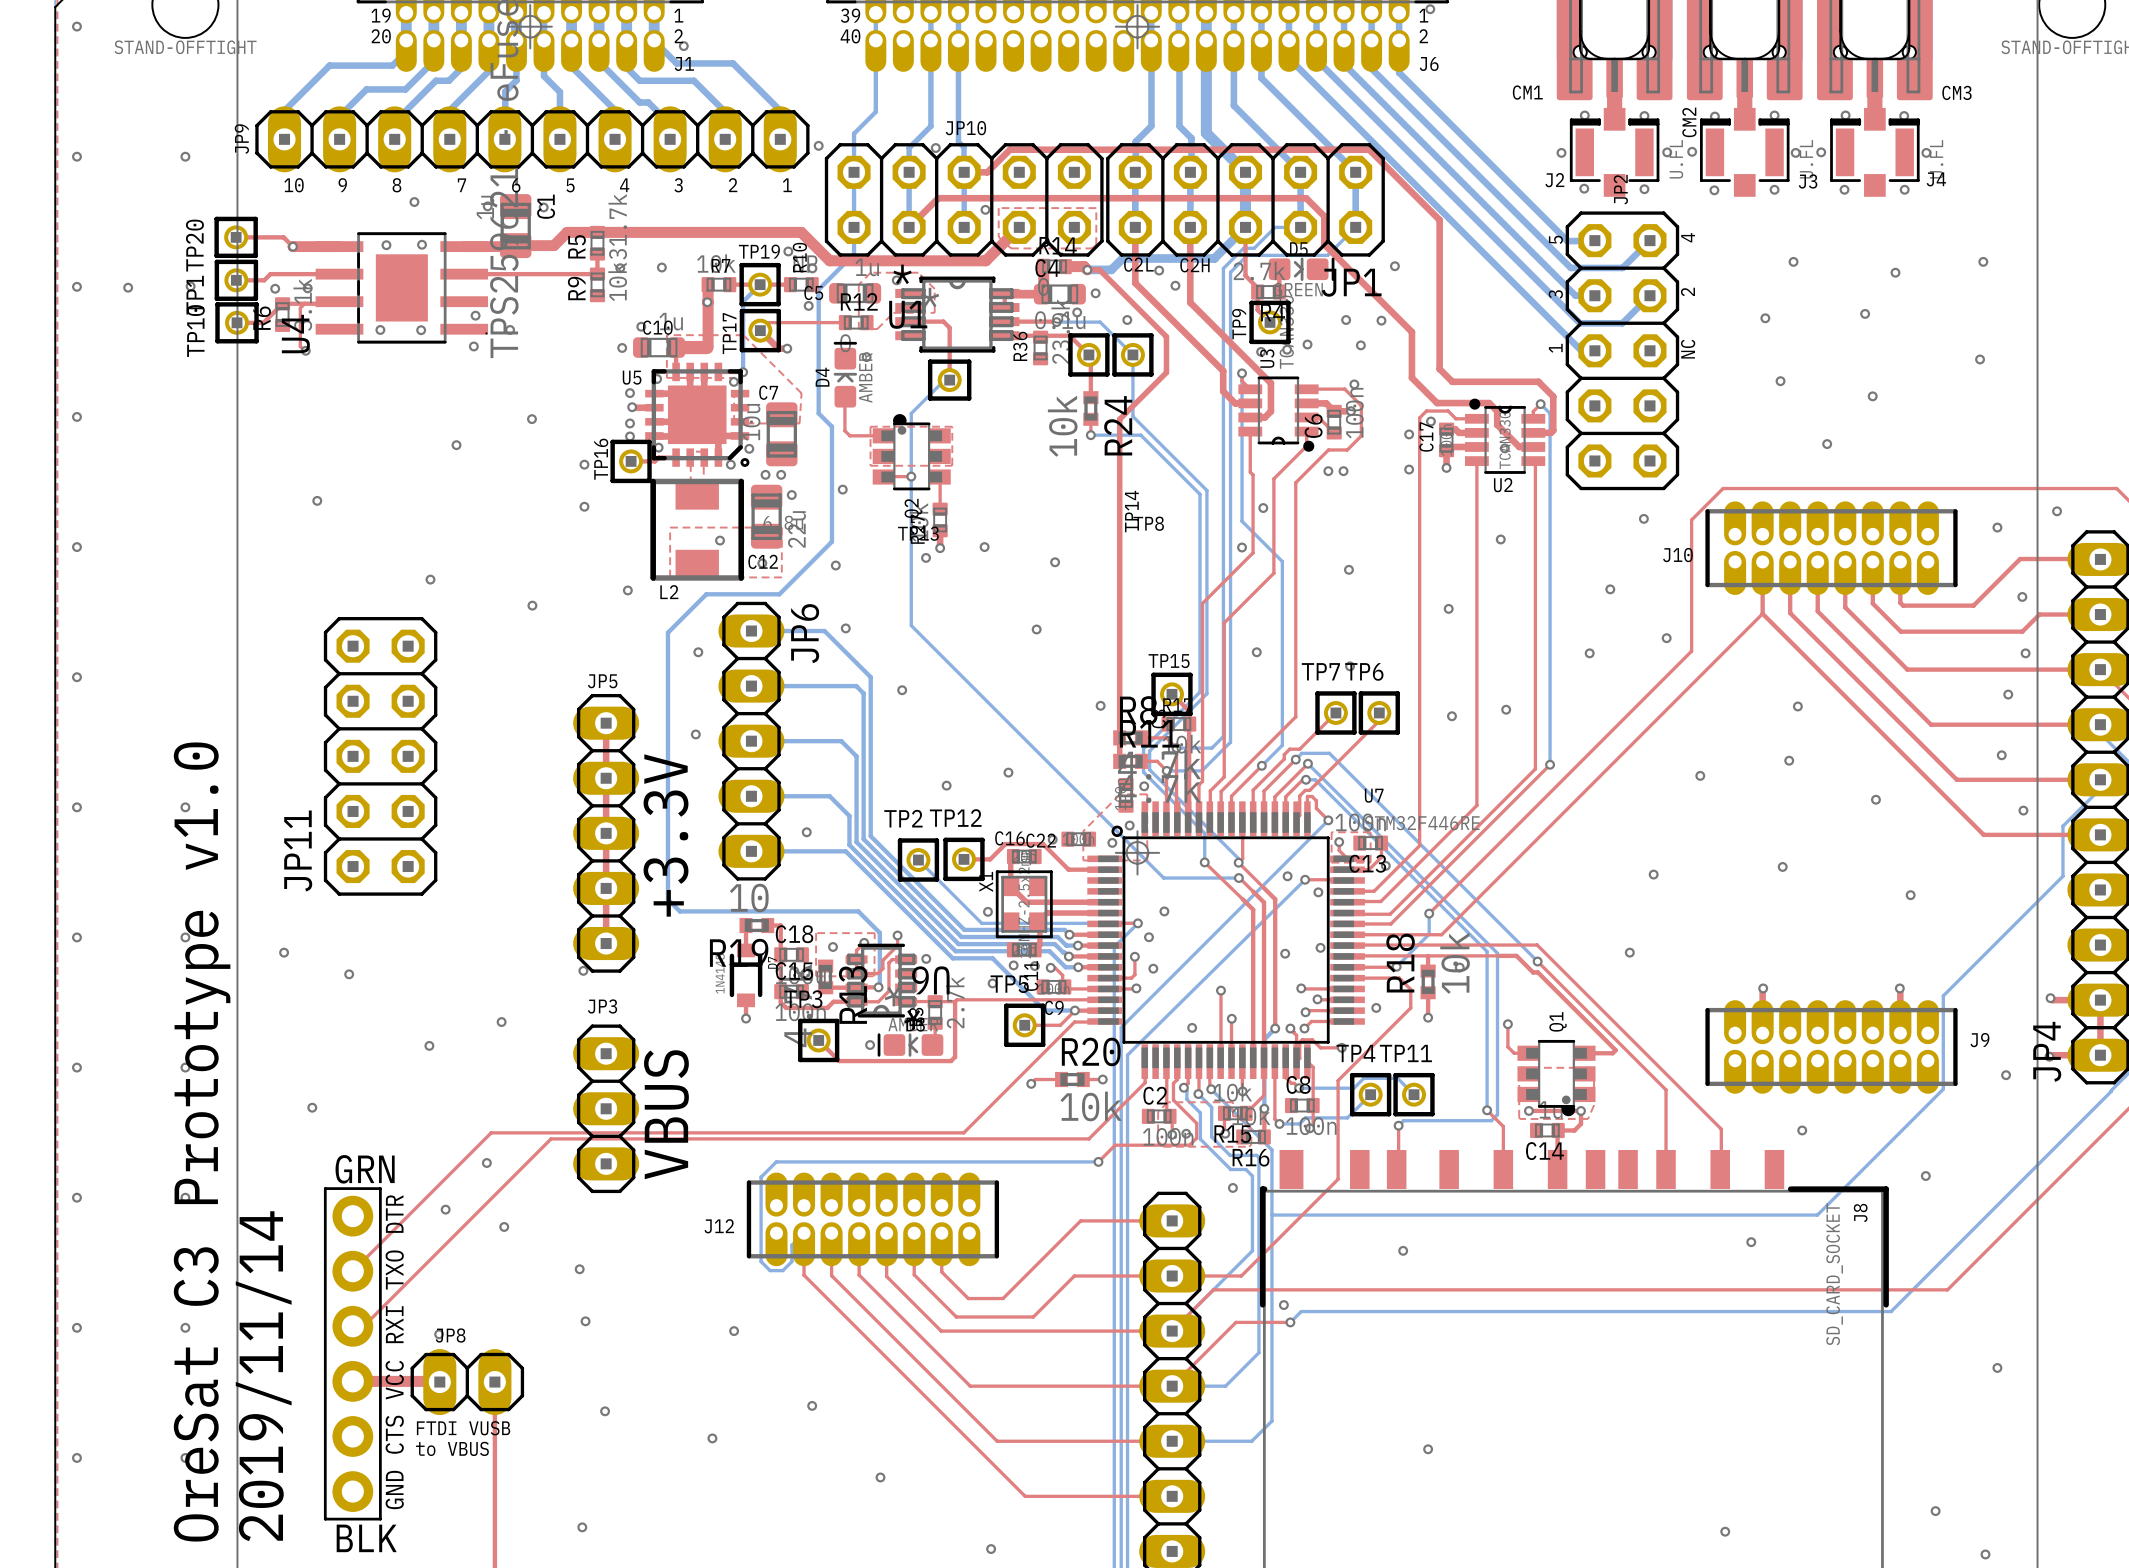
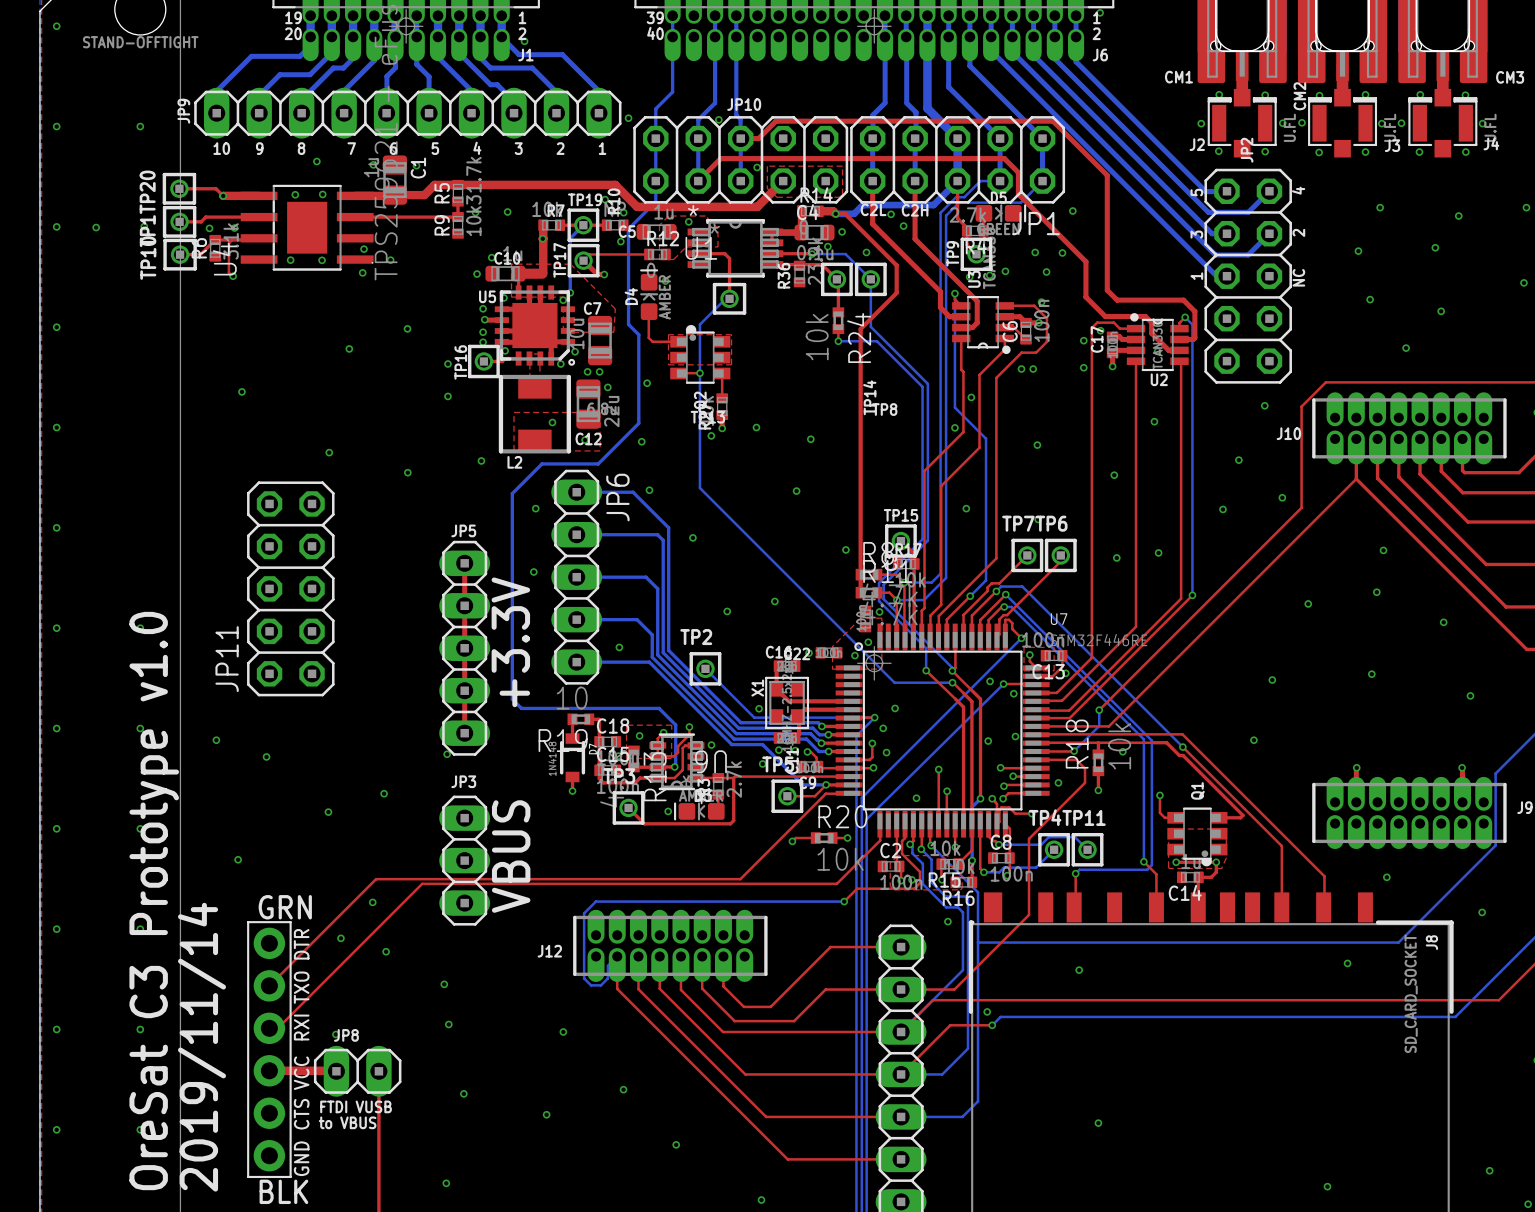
top track: (963, 859) (990, 859) (1005, 844) (1043, 844) (1068, 869) (1104, 869) -> none
TP12: (963, 859) -> none

